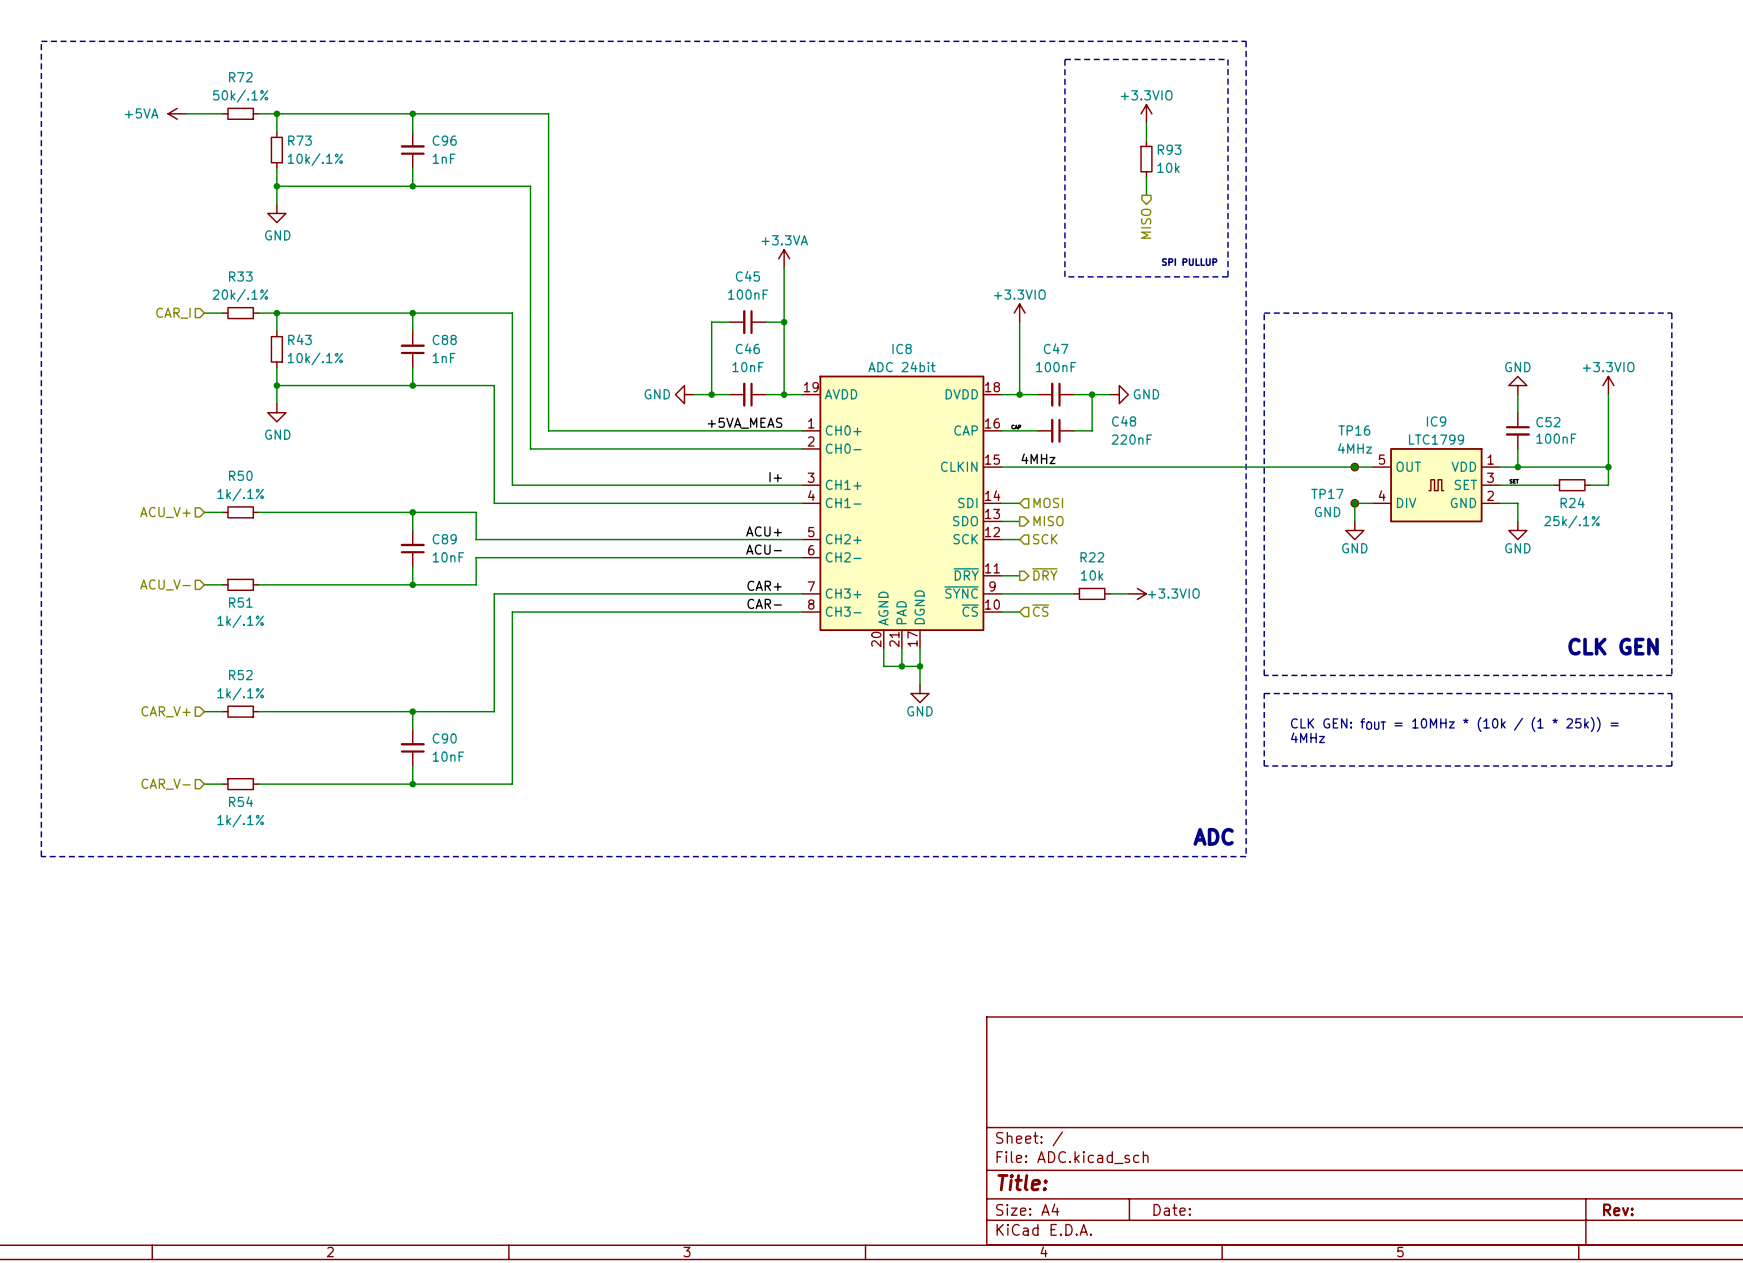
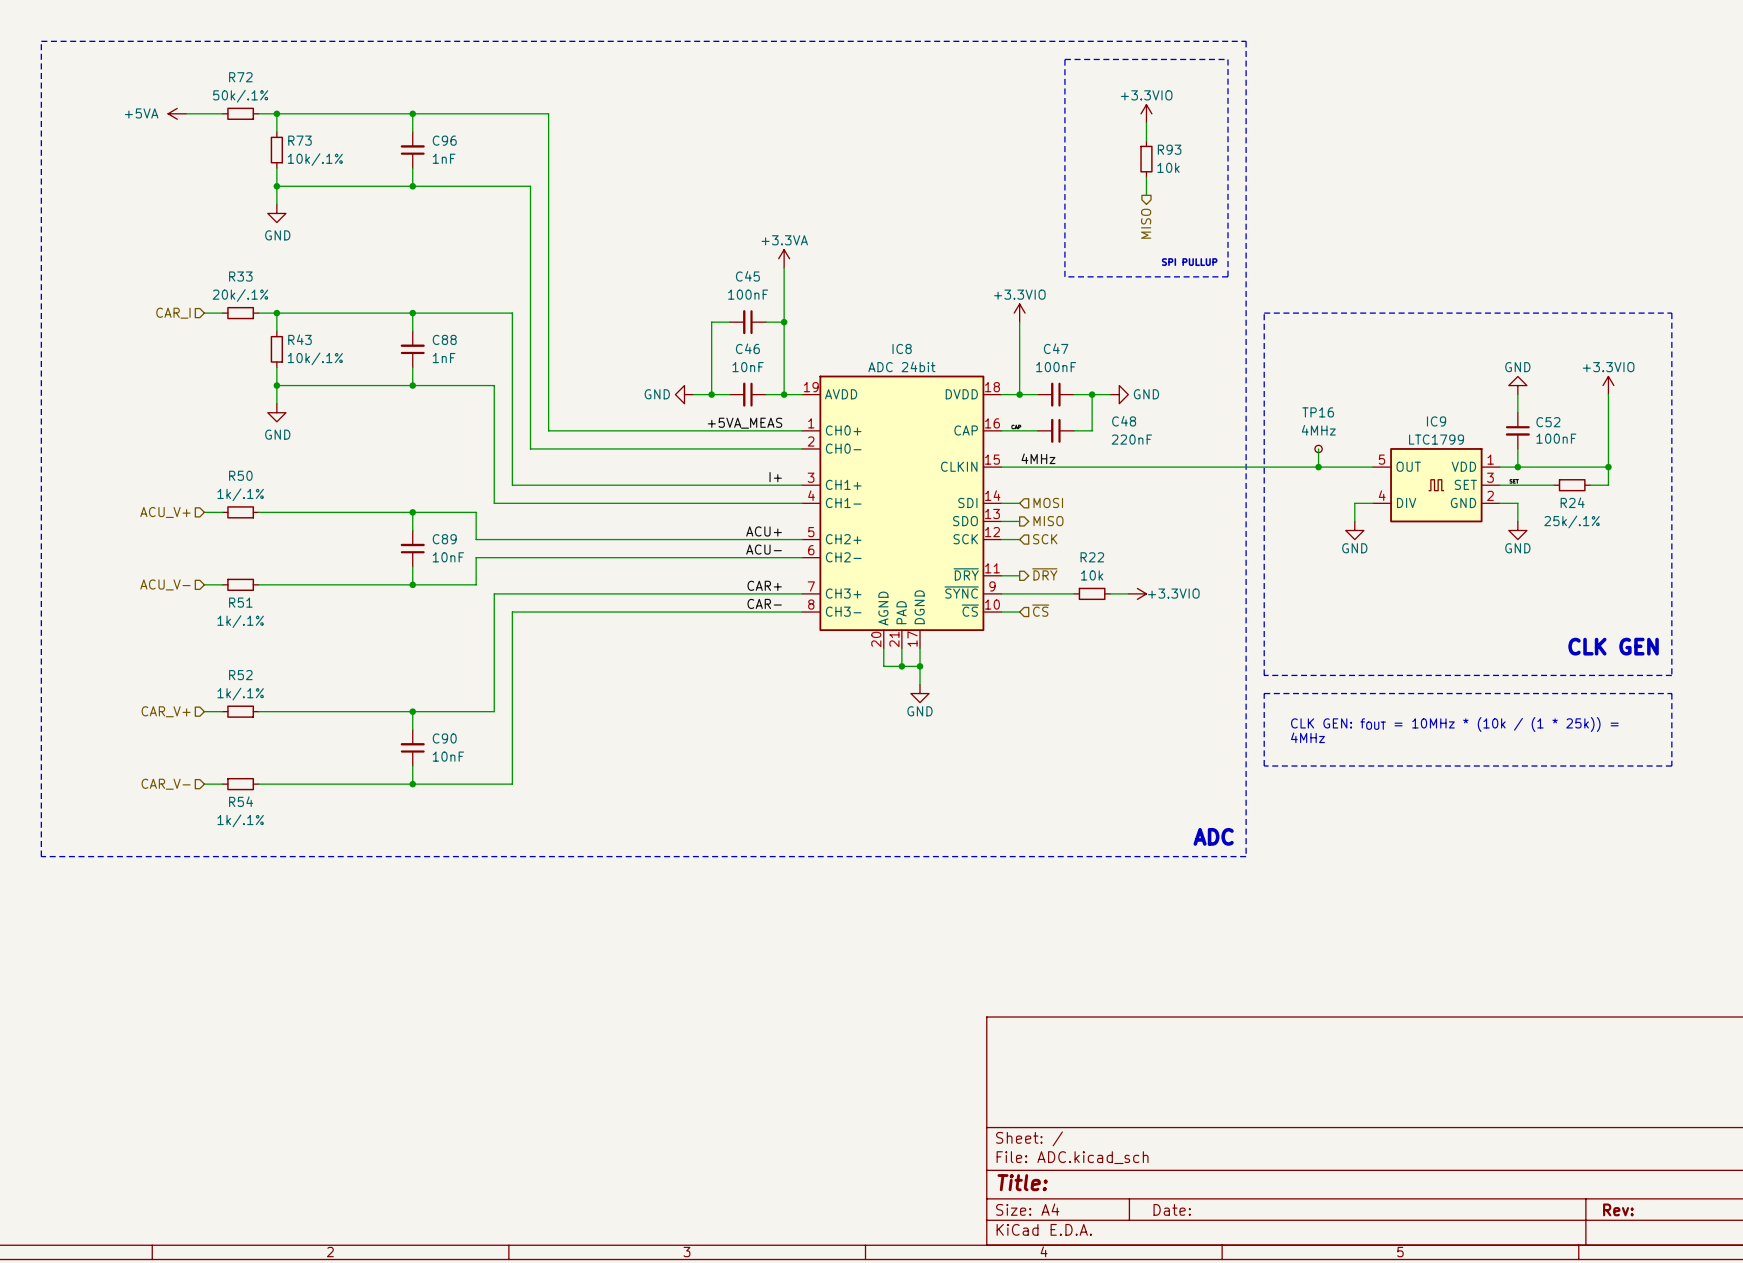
wire: none -> (1318, 448) (1318, 467)
junction: none -> (1318, 467)
junction: (1354, 467) -> none
TP16 position: (1354, 467) -> (1318, 448)
junction: (1354, 503) -> none
TP17: GND (1354, 503) -> none

